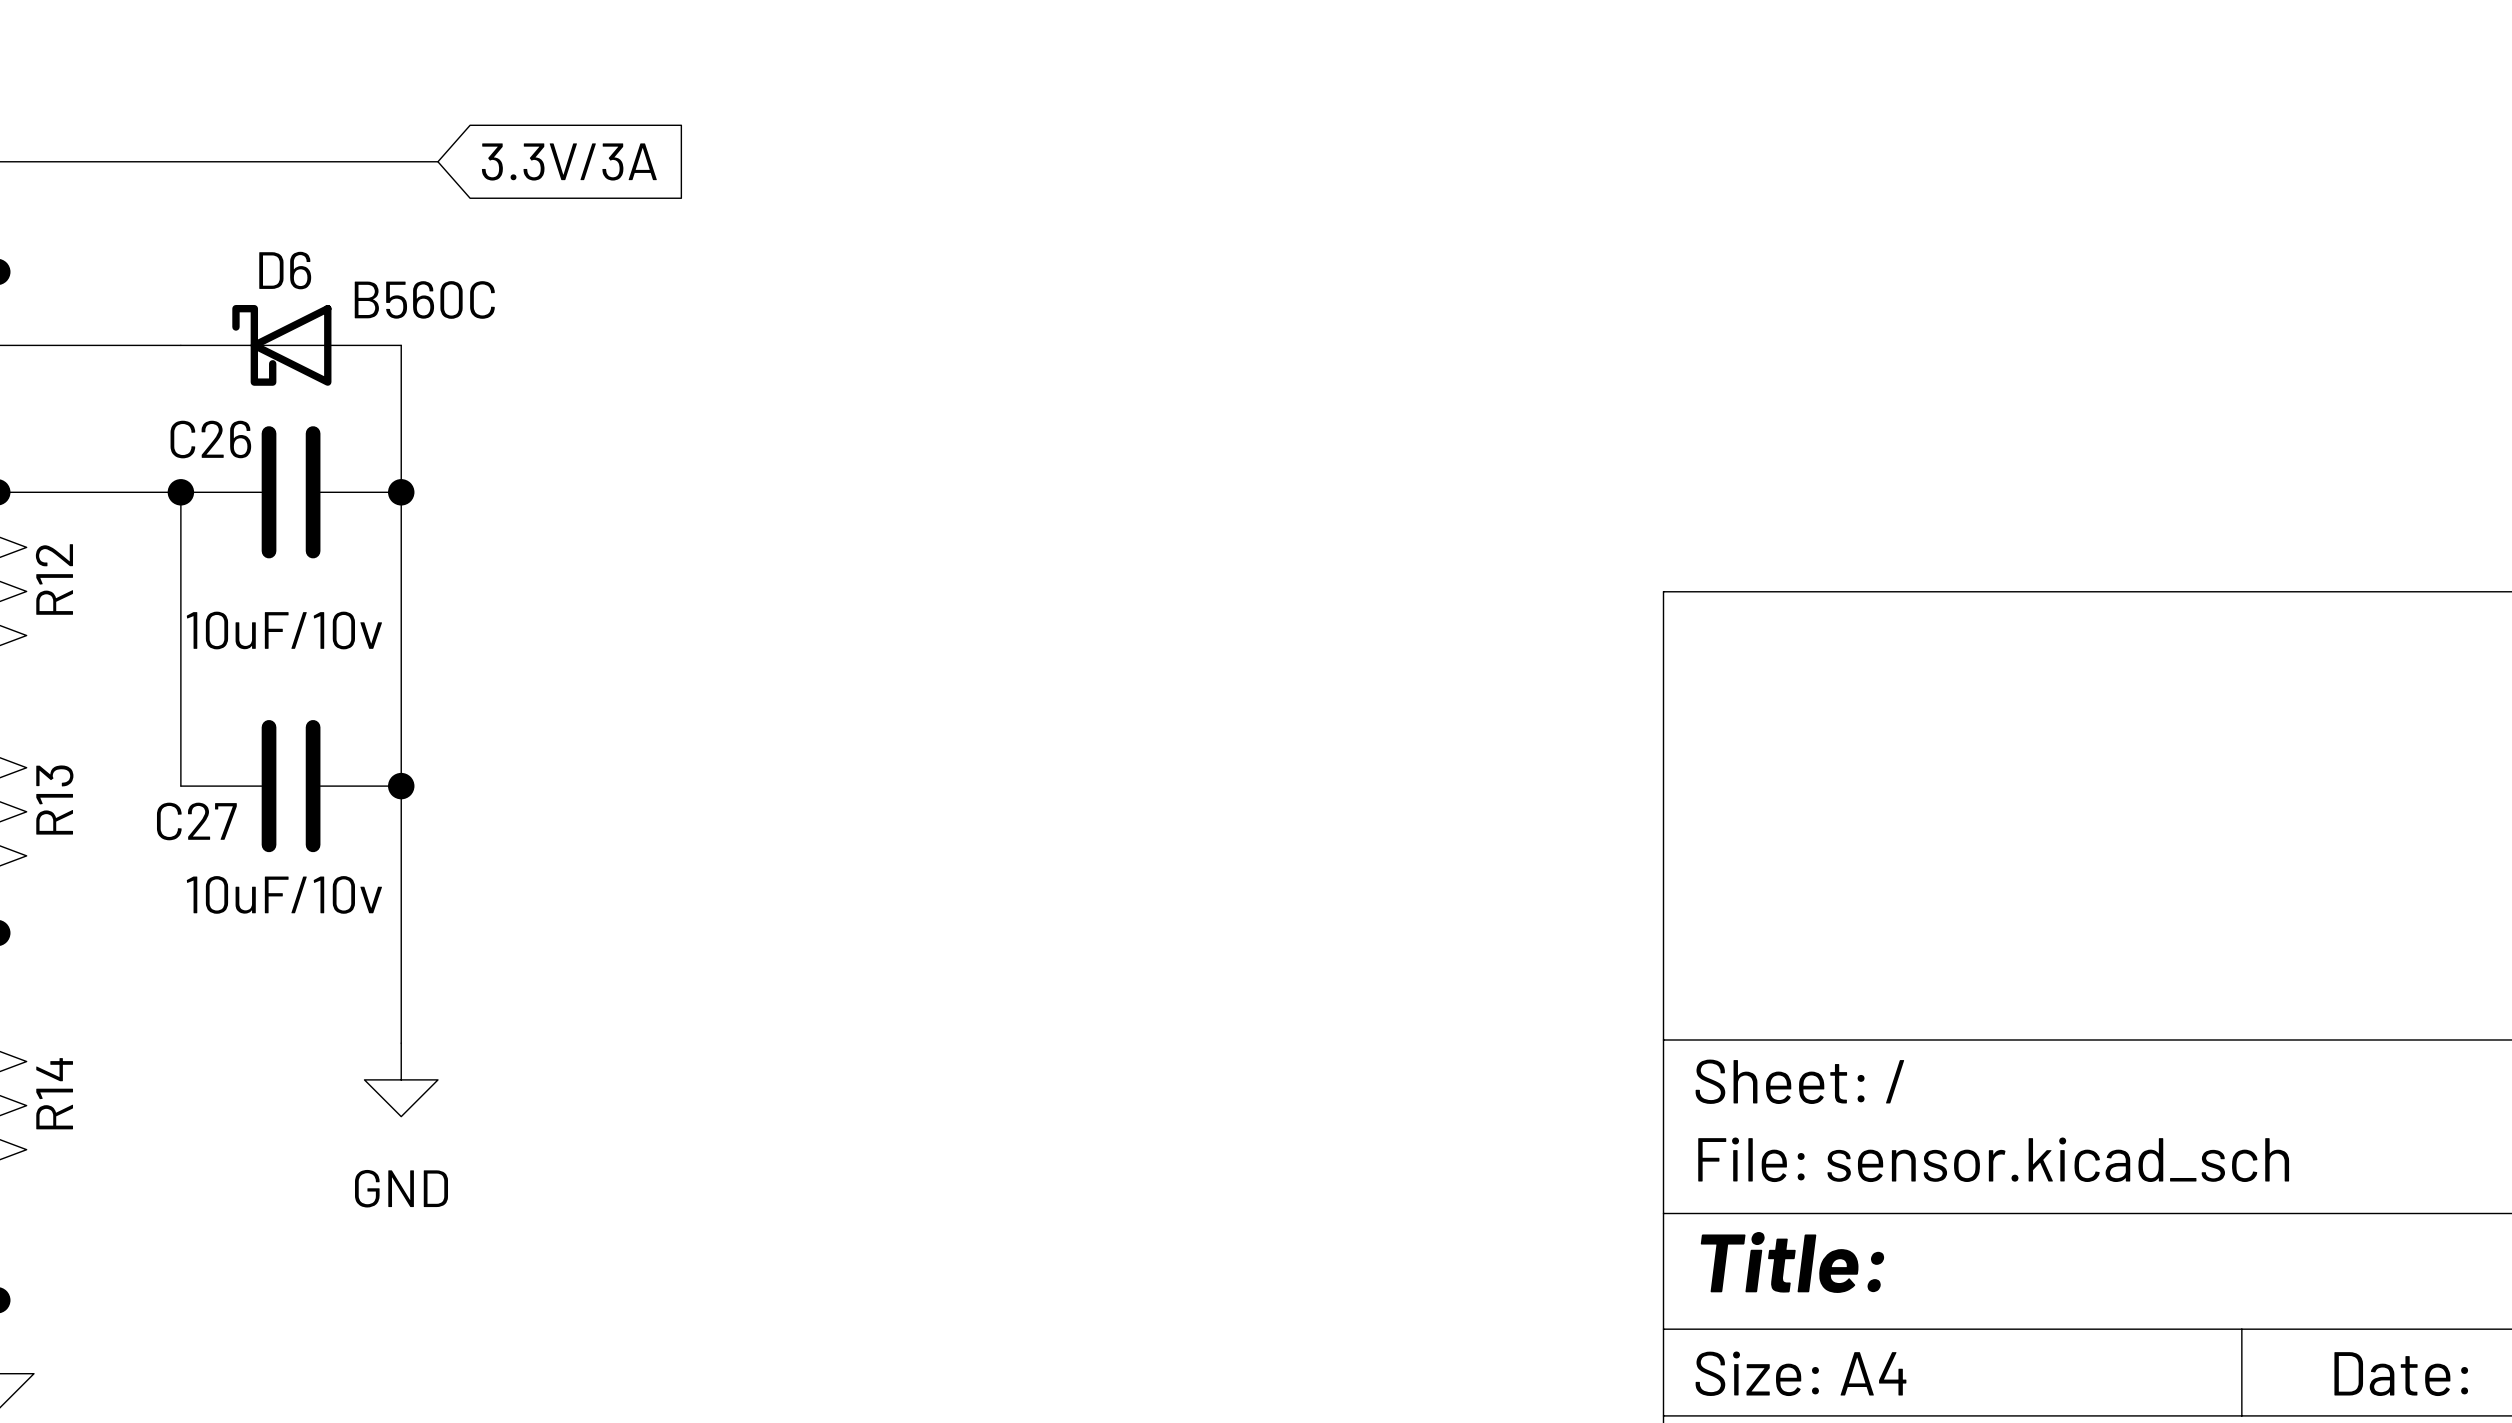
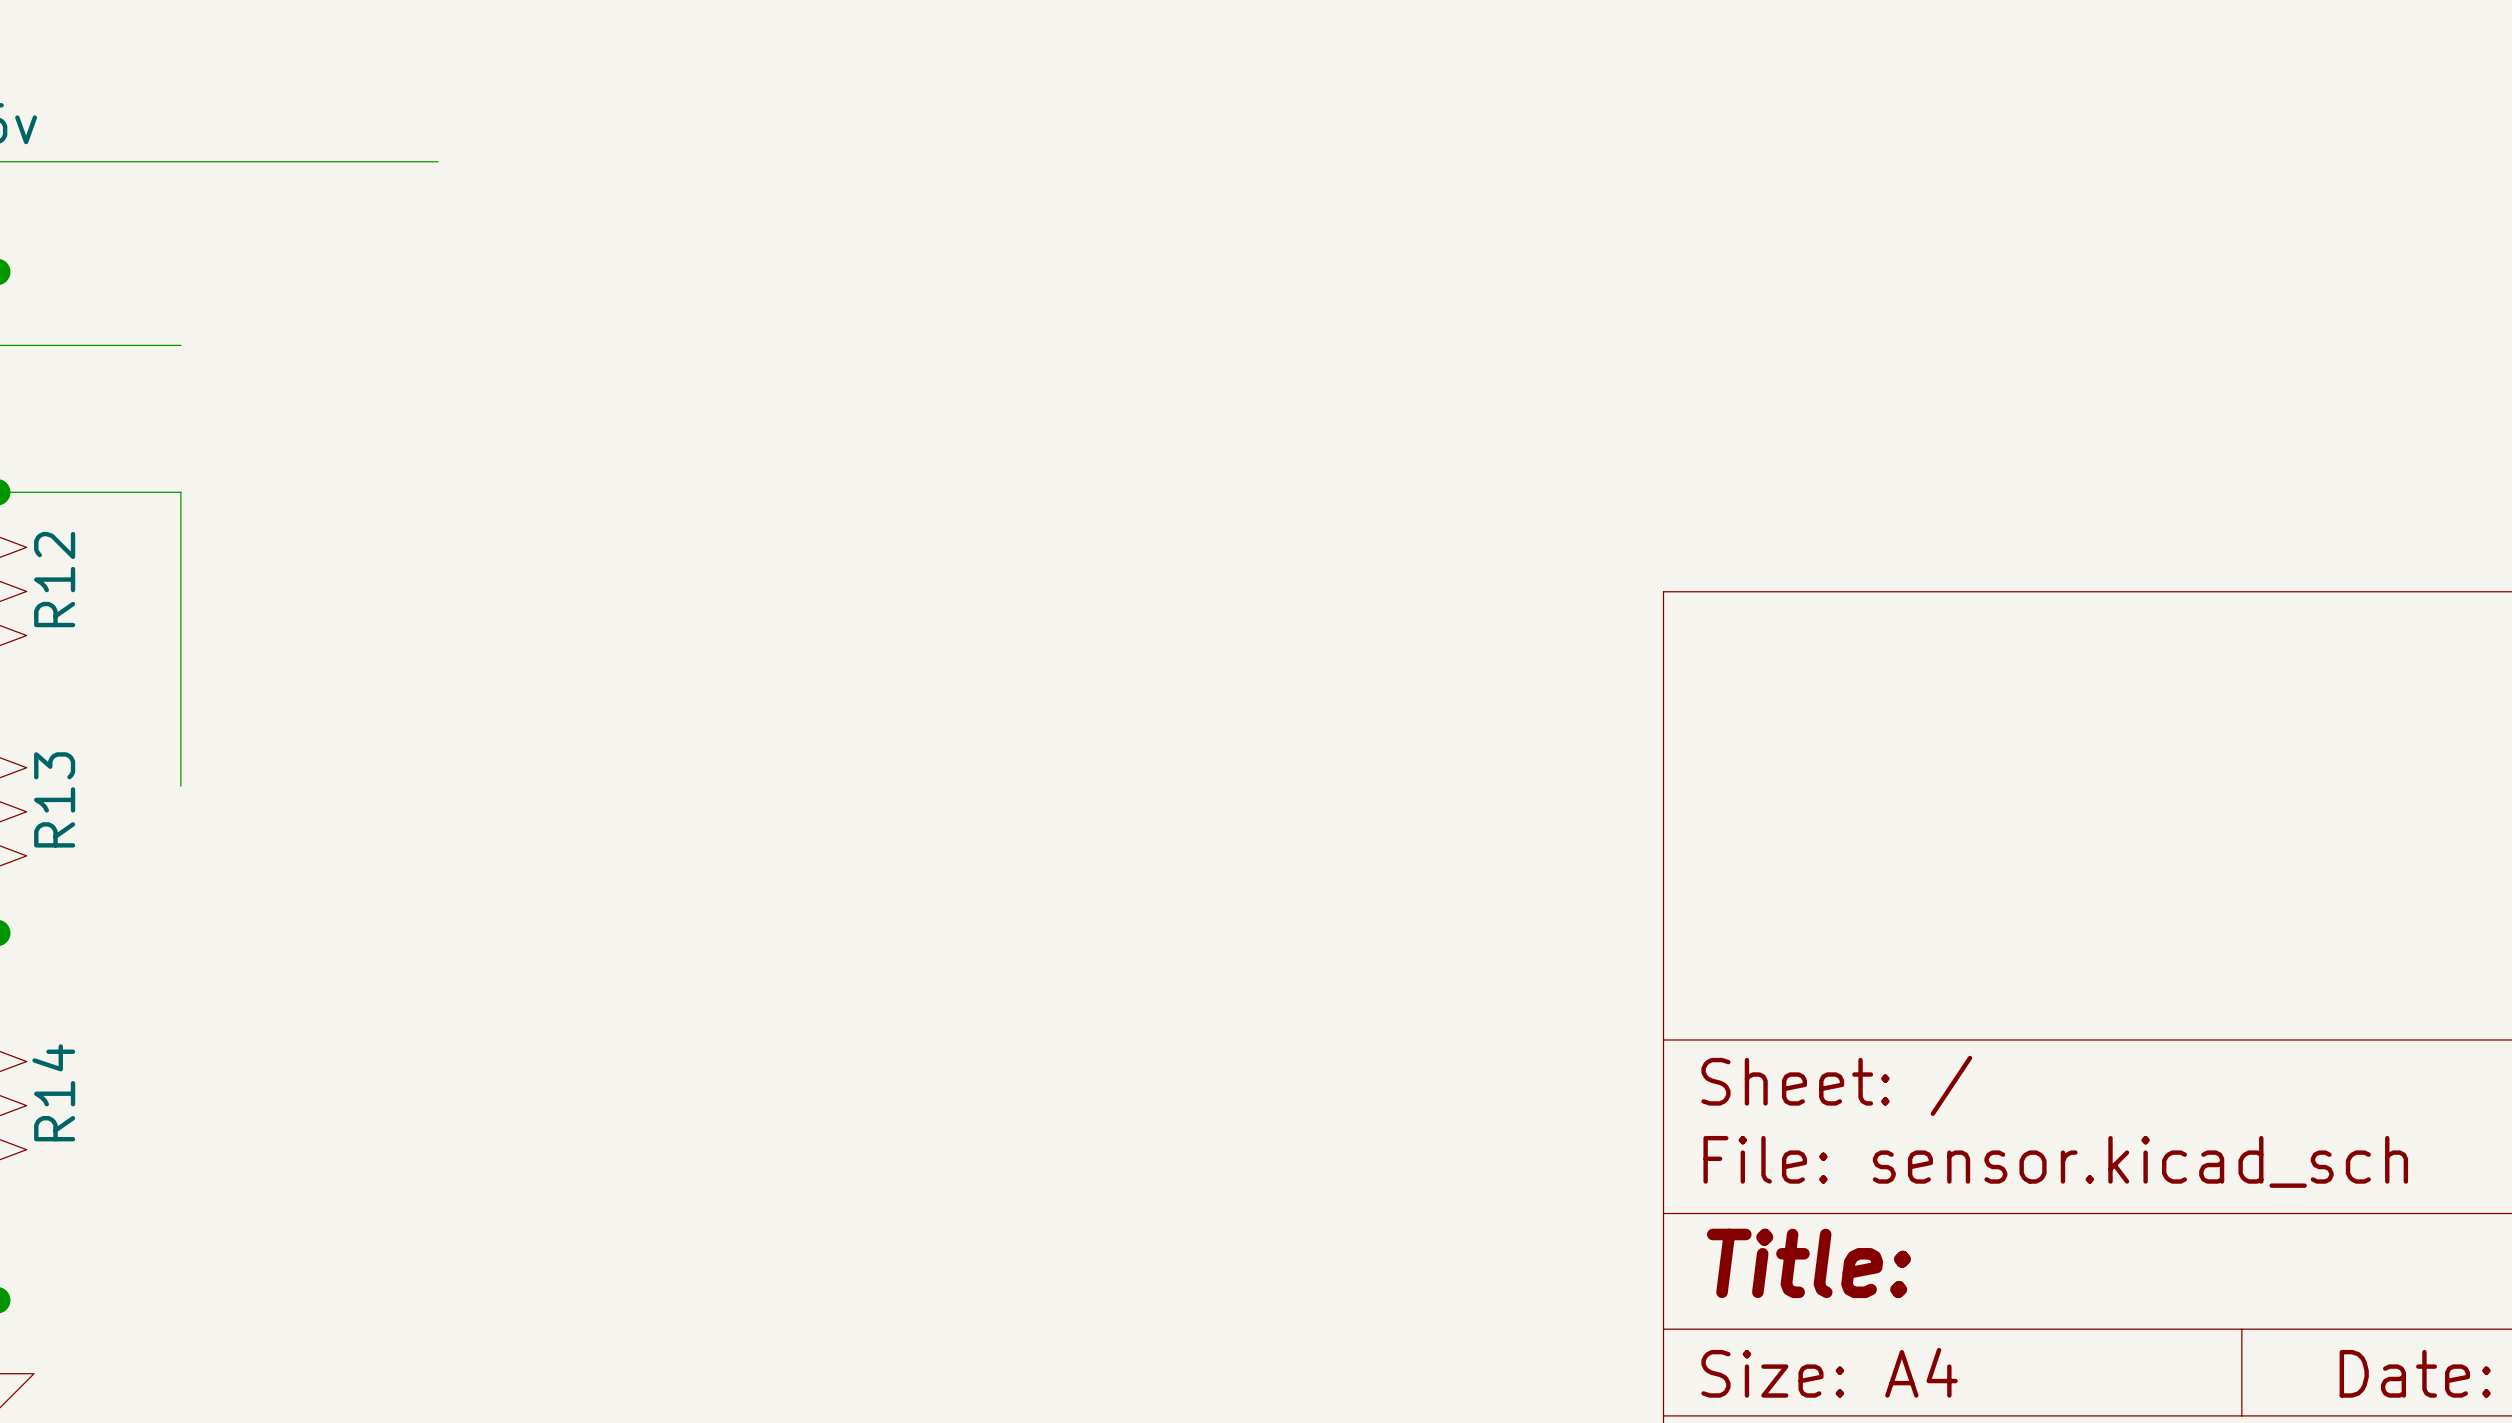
global label: 3.3V/3A (569, 161) -> none
D6: B560C (291, 345) -> none
wire: (401, 345) (401, 1043) -> none
junction: (180, 492) -> none
C26: 10uF/10v (291, 492) -> none
junction: (401, 492) -> none
C27: 10uF/10v (291, 786) -> none
junction: (401, 786) -> none
power symbol: GND (401, 1079) -> none

